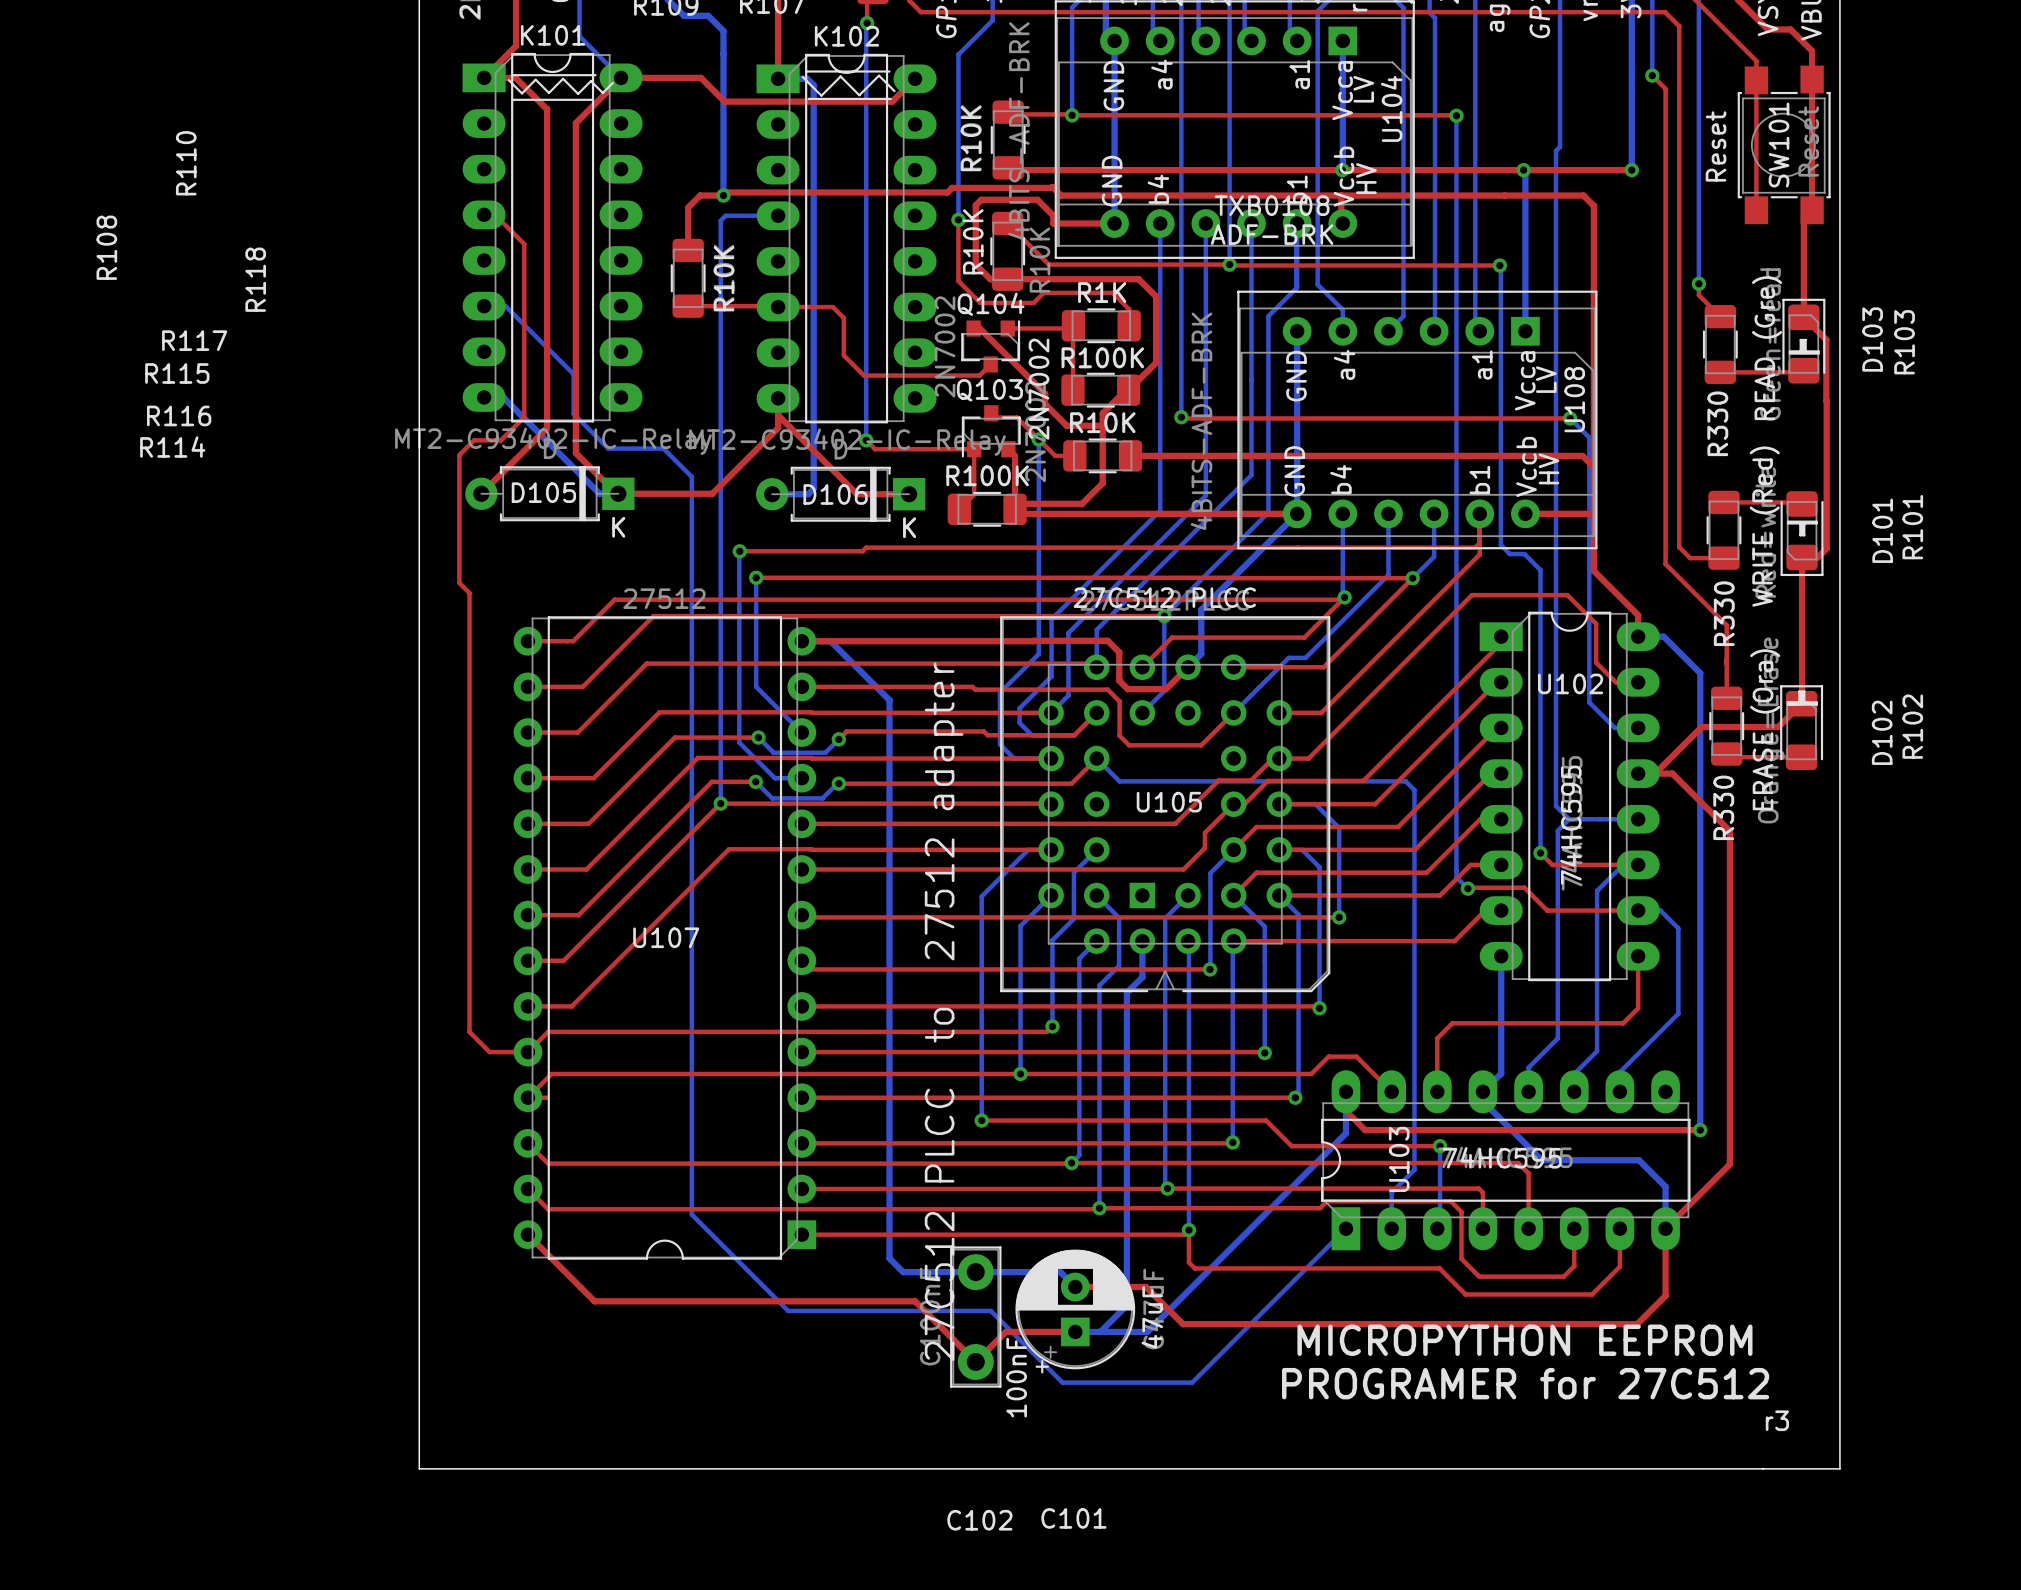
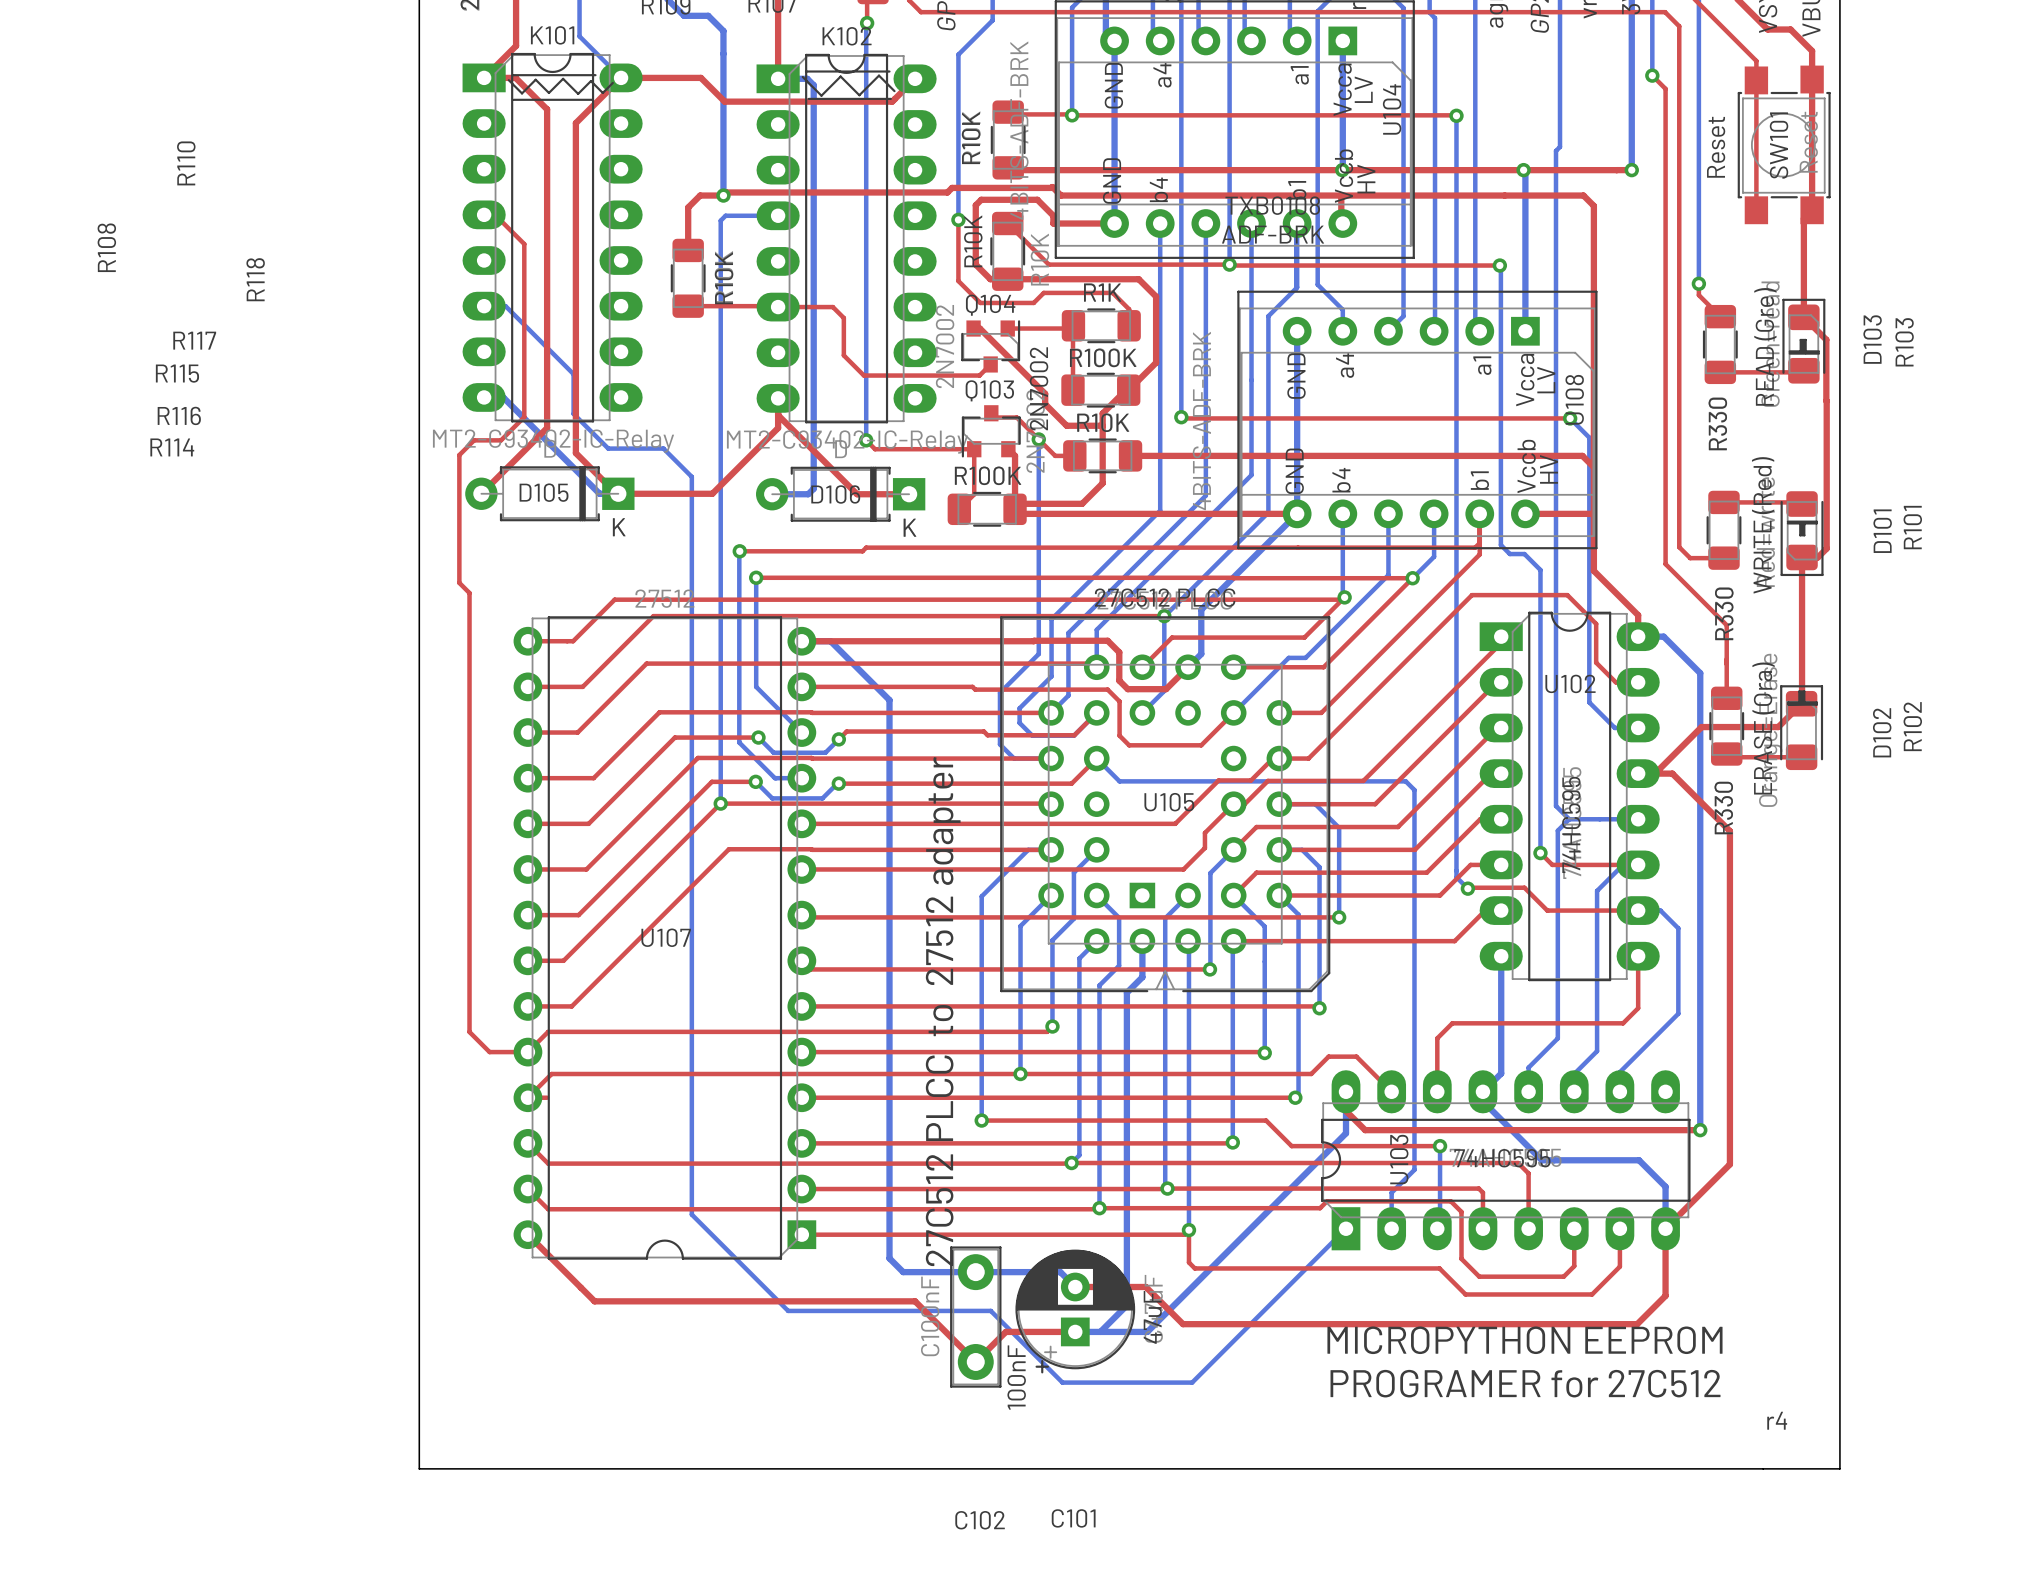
text: r3 (1777, 1420) -> r4 (1777, 1420)

